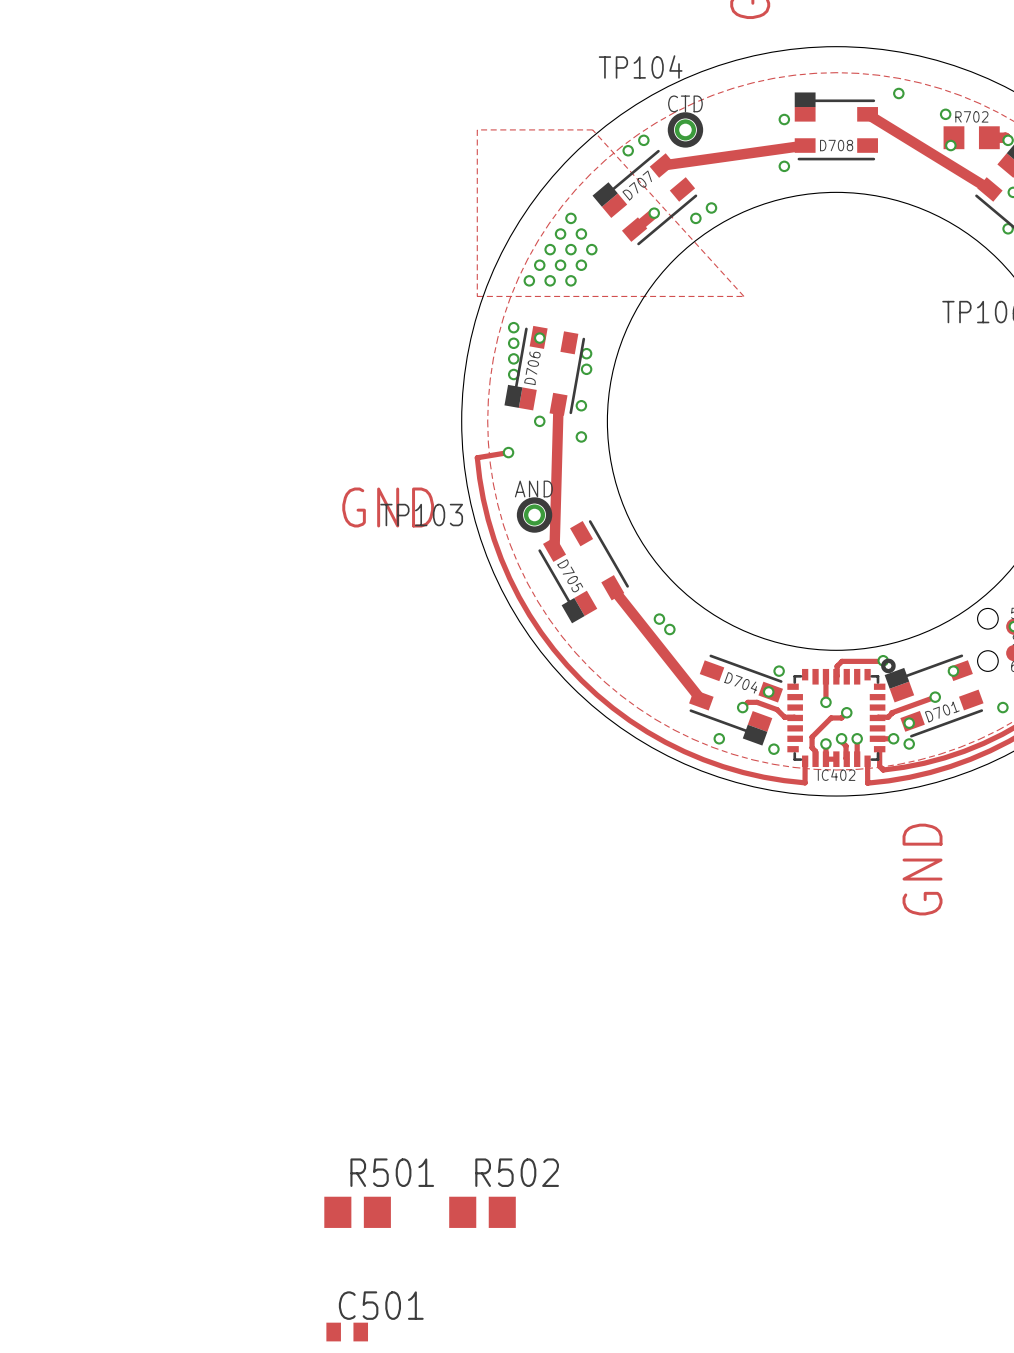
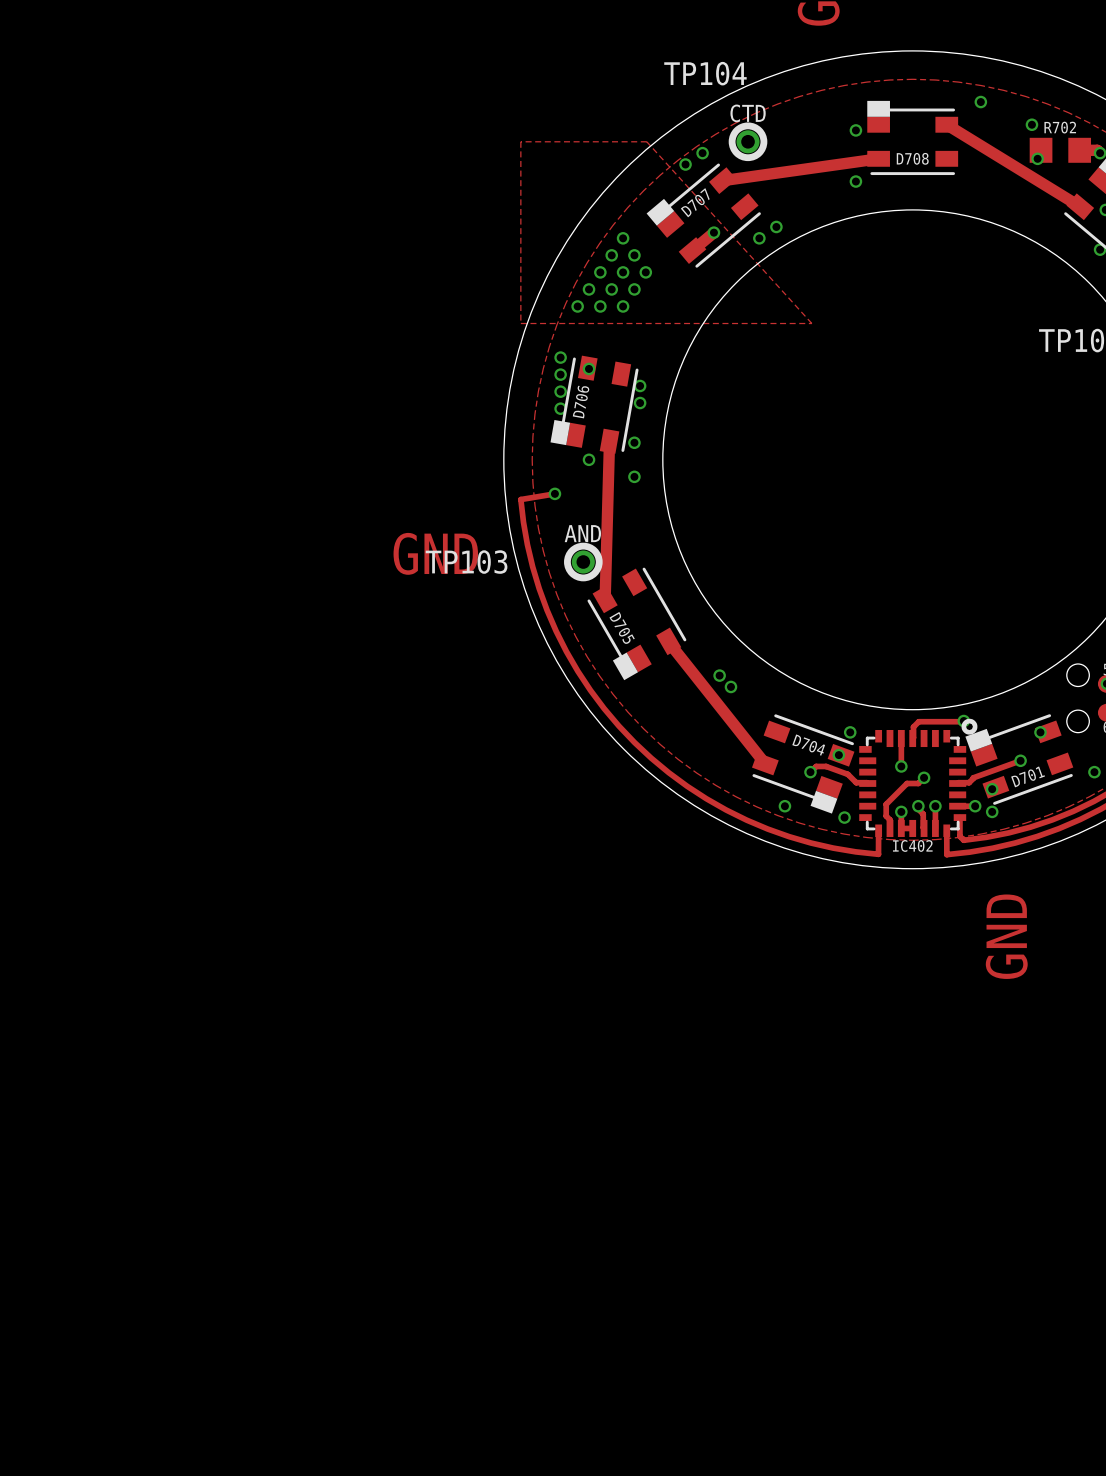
R501: (357, 1212) -> none
R502: (482, 1212) -> none
C501: (347, 1332) -> none

